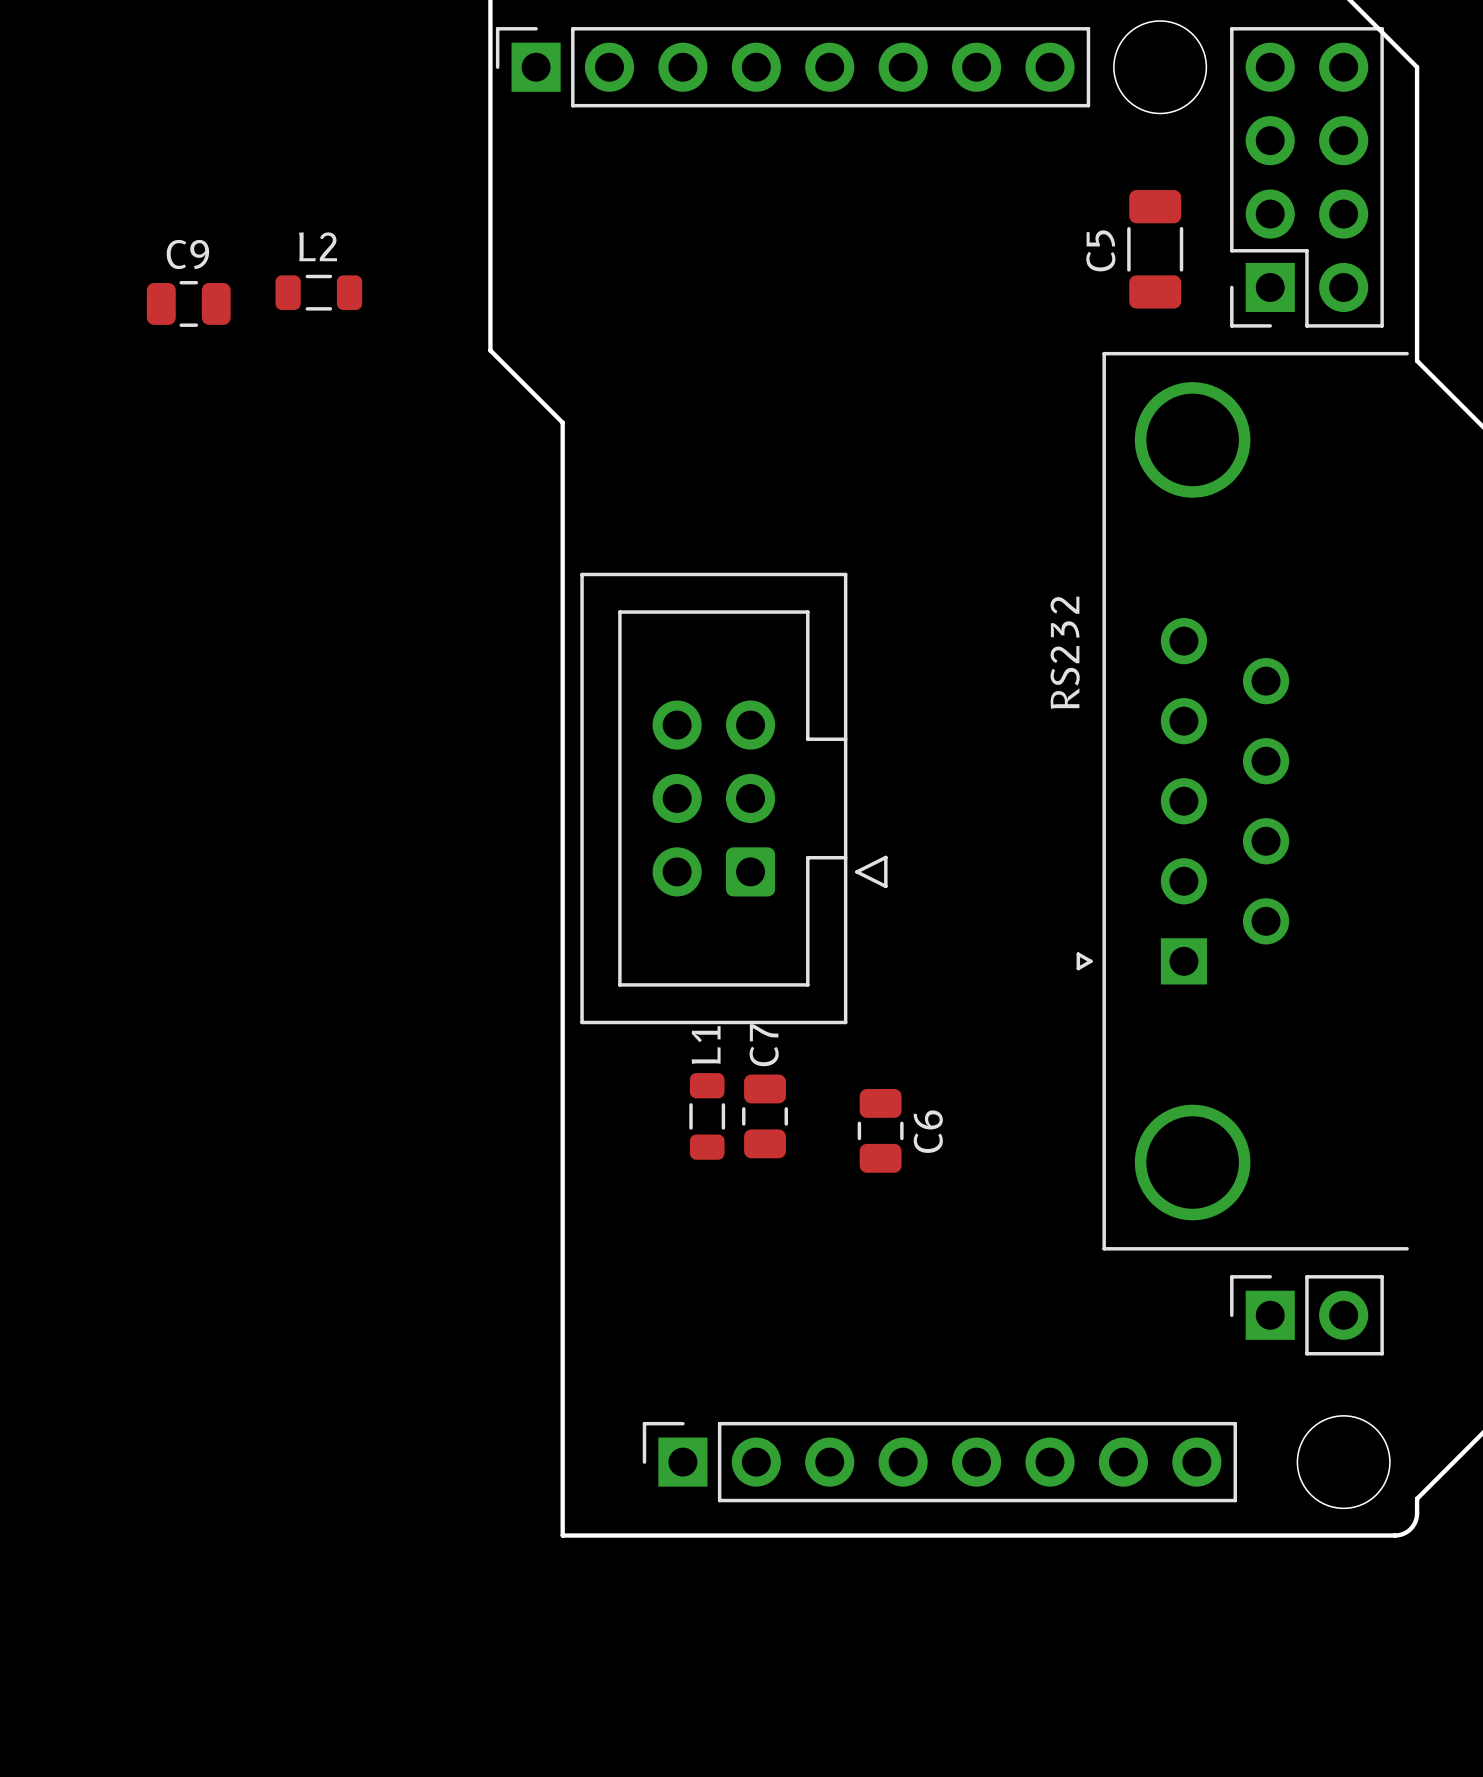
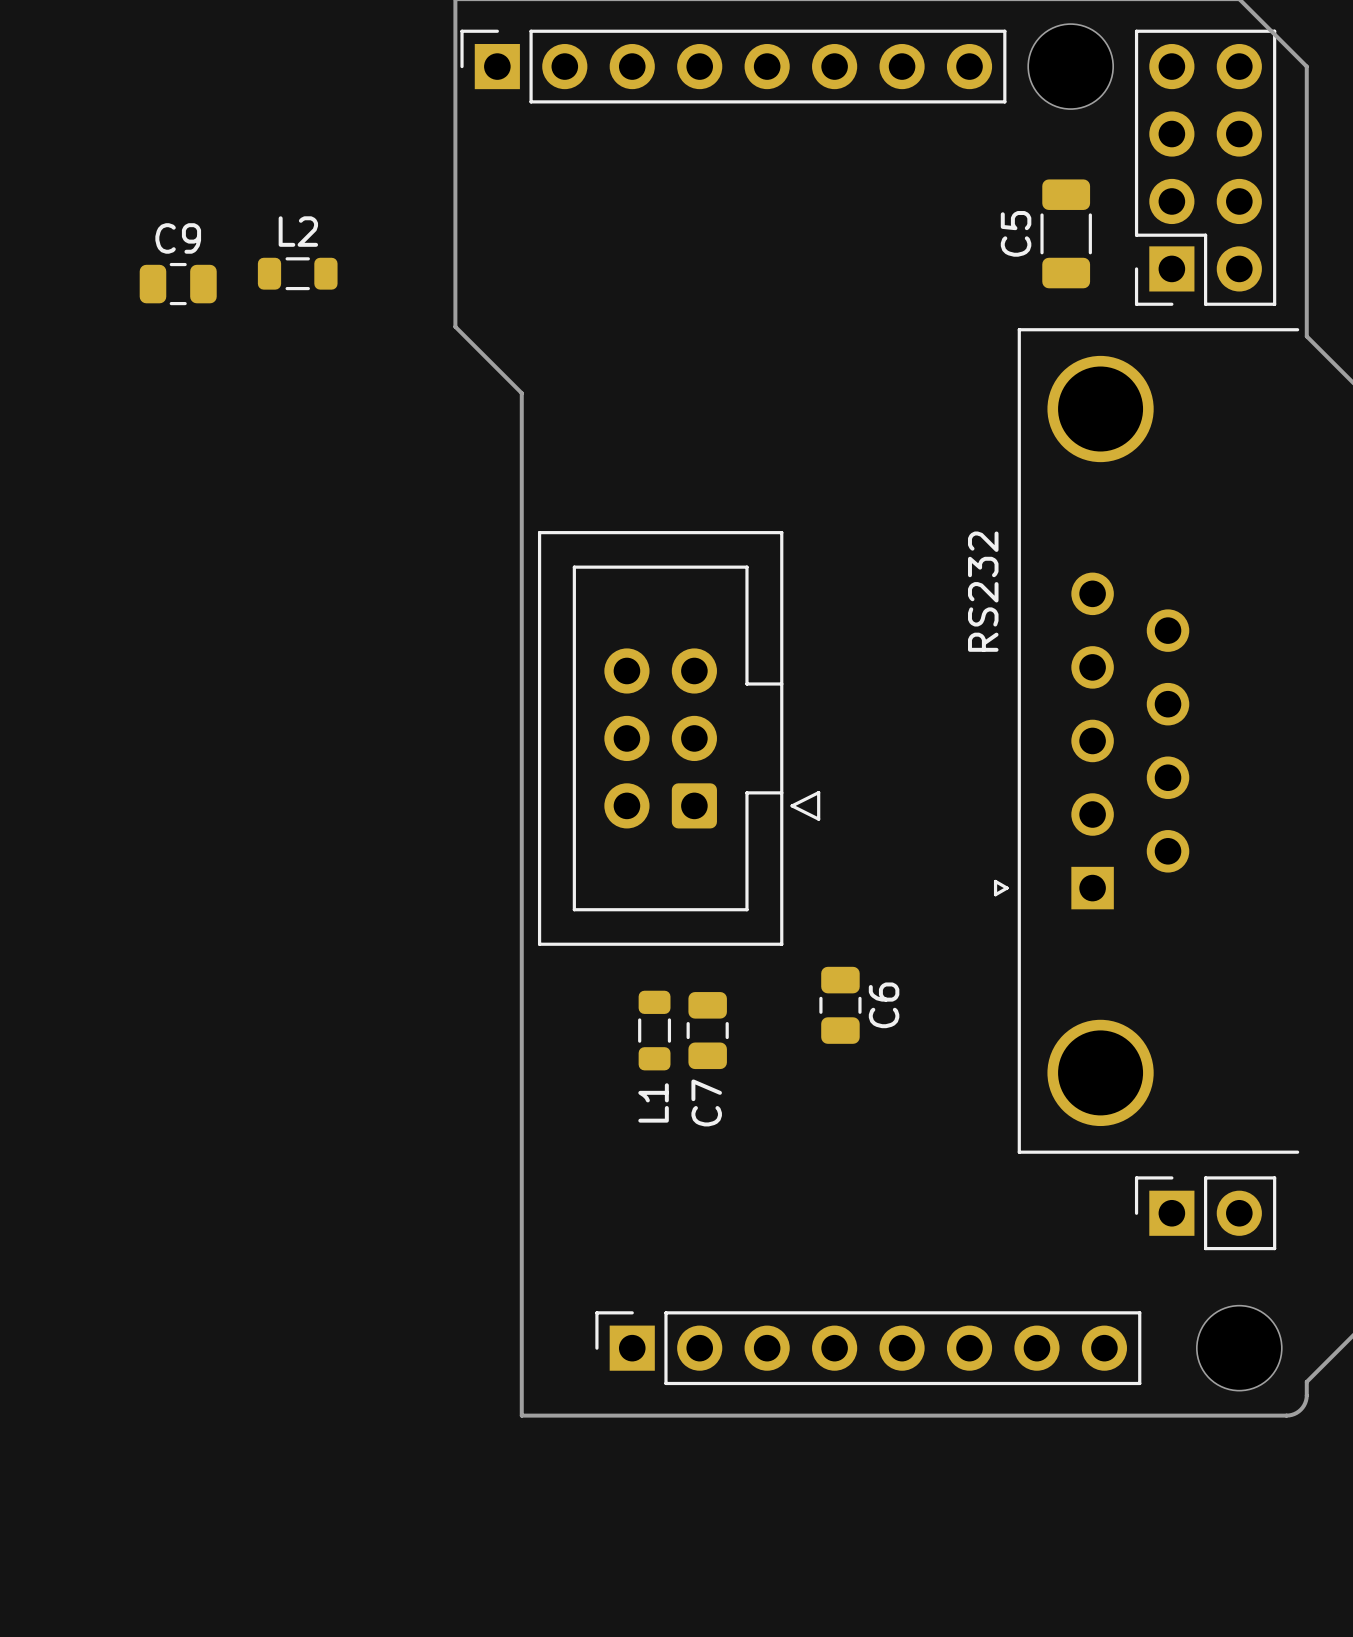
L1 name position: L1 (706, 1045) -> L1 (653, 1102)
C7 name position: C7 (764, 1045) -> C7 (706, 1102)
C6 position: (880, 1130) -> (840, 1005)

